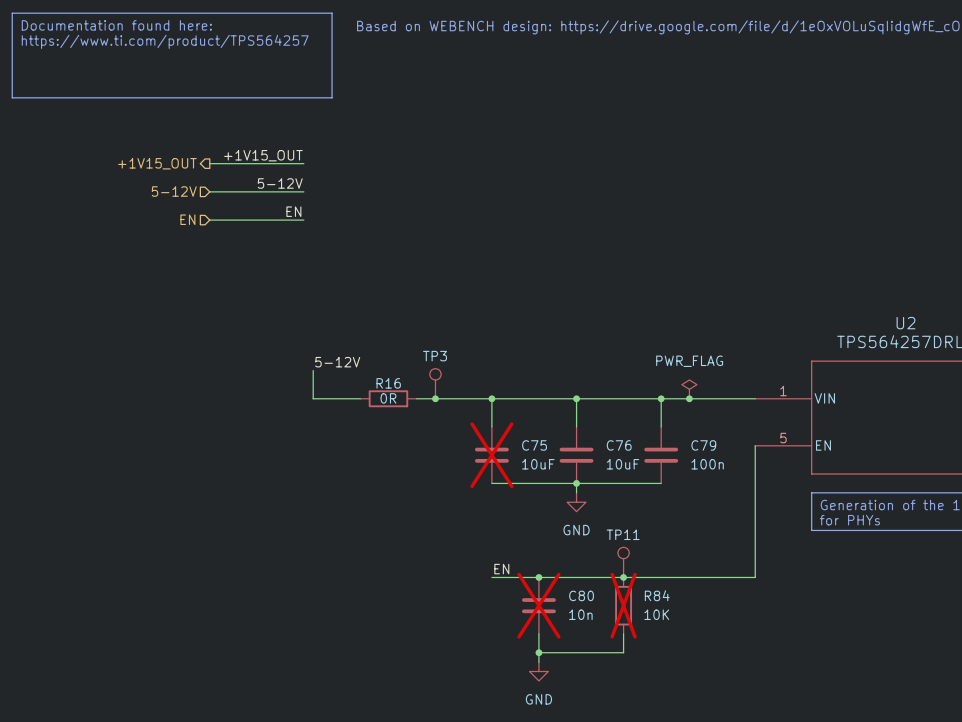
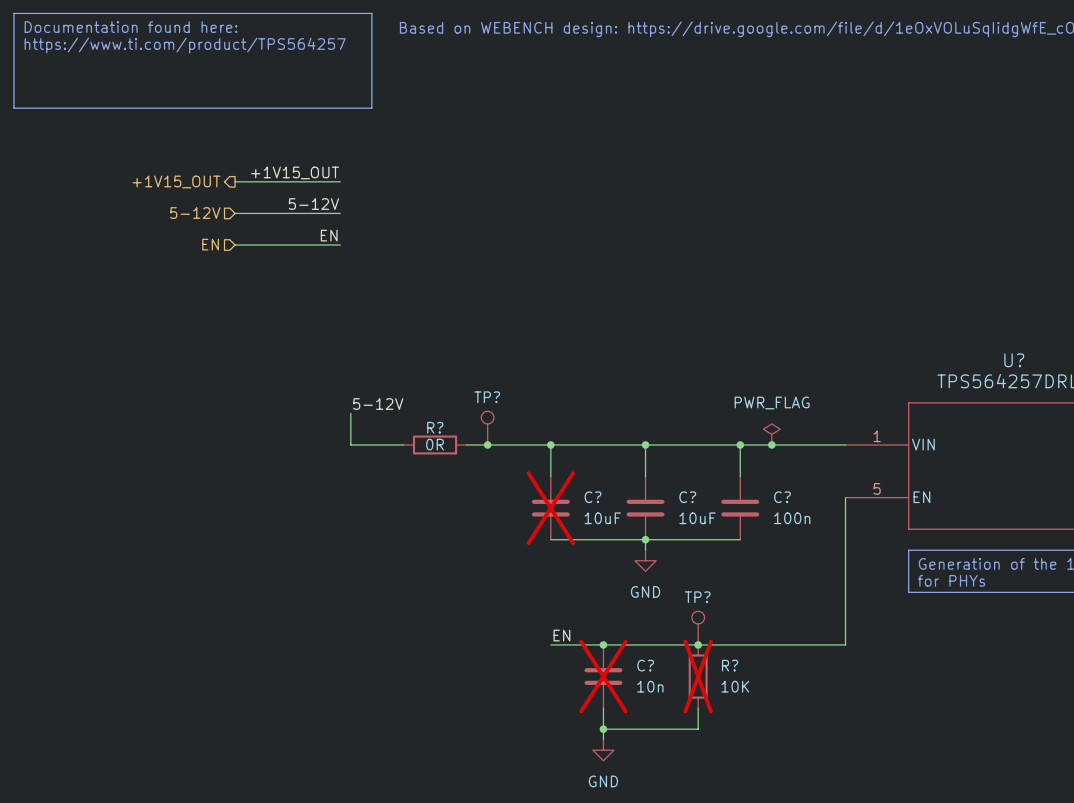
U2 name: U2 (905, 323) -> U? (1014, 360)
TP3 name: TP3 (435, 356) -> TP? (487, 397)
R16 name: R16 (388, 383) -> R? (435, 427)
C75 name: C75 (534, 445) -> C? (592, 497)
C76 name: C76 (619, 445) -> C? (687, 497)
C79 name: C79 (703, 445) -> C? (782, 497)
TP11 name: TP11 (623, 534) -> TP? (697, 597)
C80 name: C80 (581, 595) -> C? (645, 665)
R84 name: R84 (657, 595) -> R? (730, 665)

